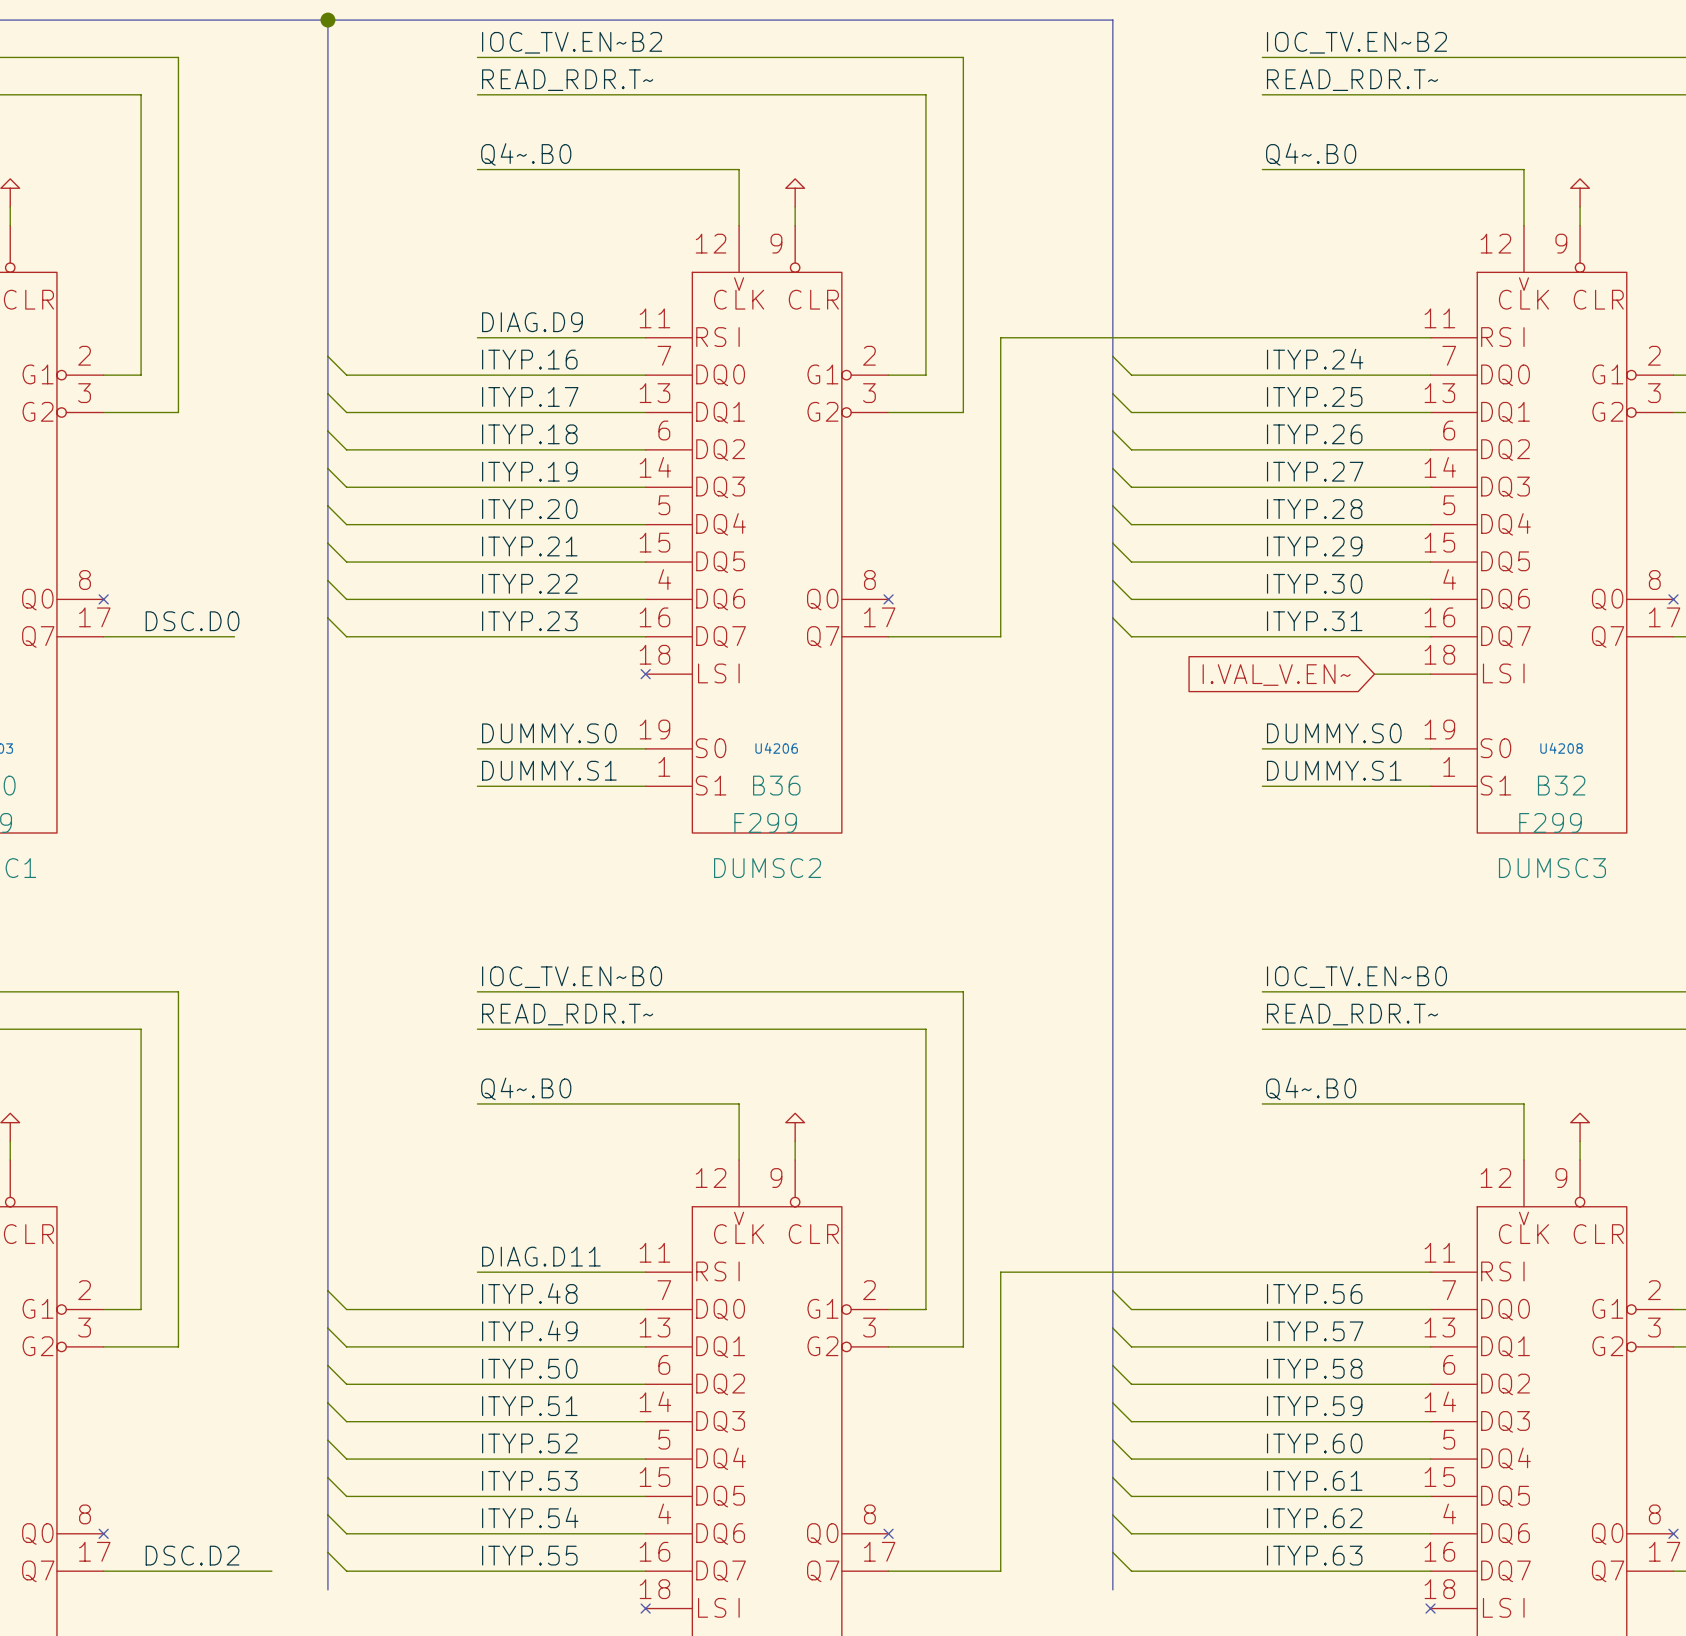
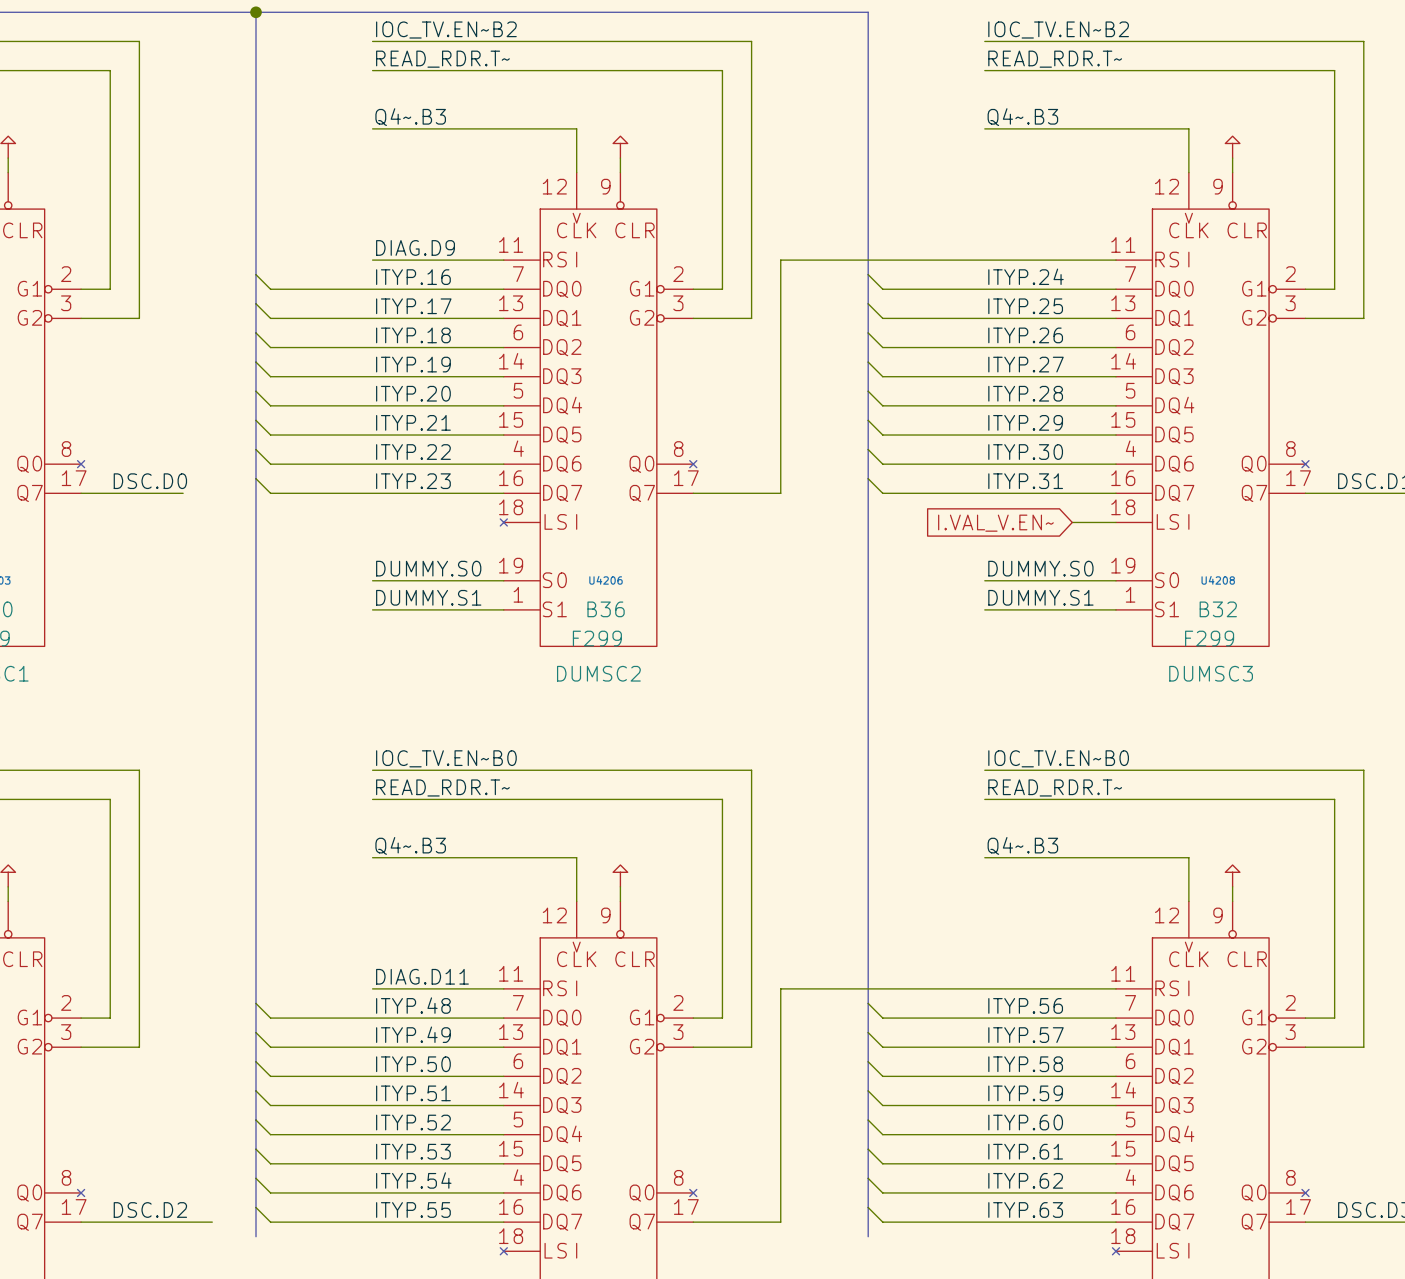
label: Q4~.B0 (526, 154) -> Q4~.B3 (410, 117)
label: Q4~.B0 (1311, 154) -> Q4~.B3 (1022, 117)
label: Q4~.B0 (526, 1088) -> Q4~.B3 (410, 845)
label: Q4~.B0 (1311, 1088) -> Q4~.B3 (1022, 845)

